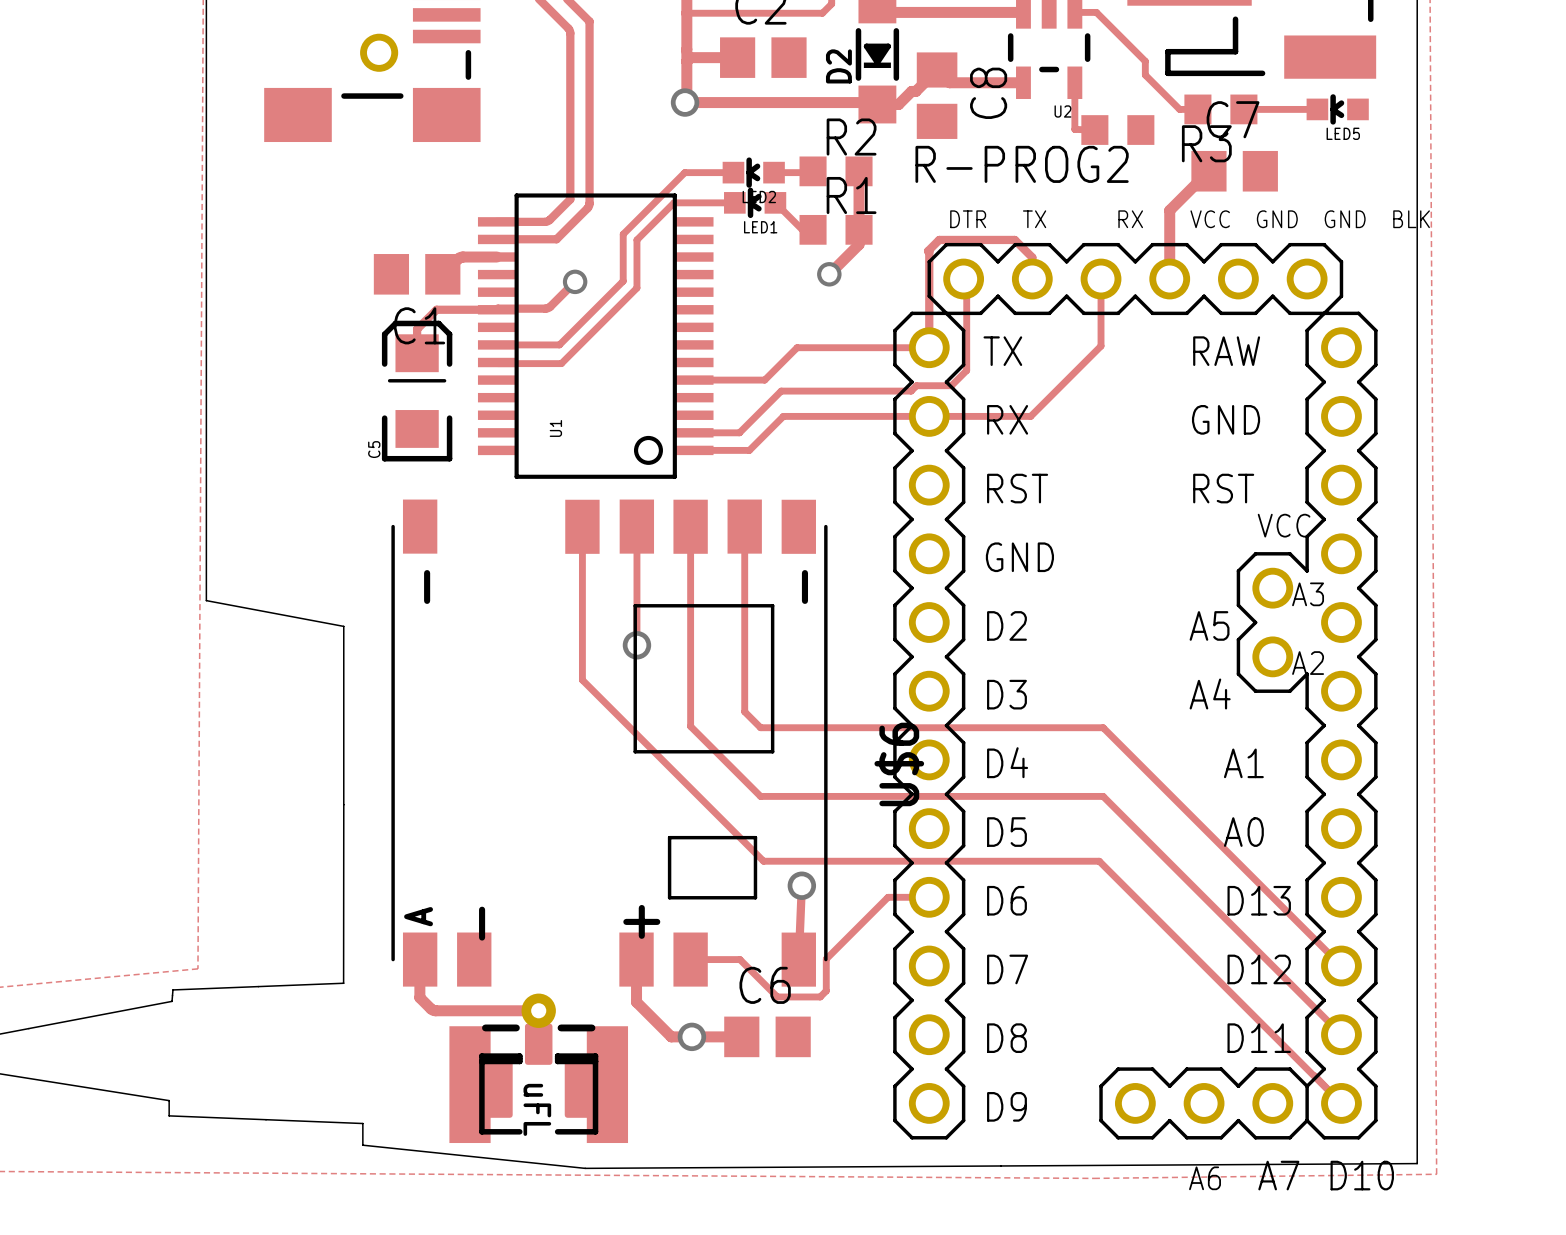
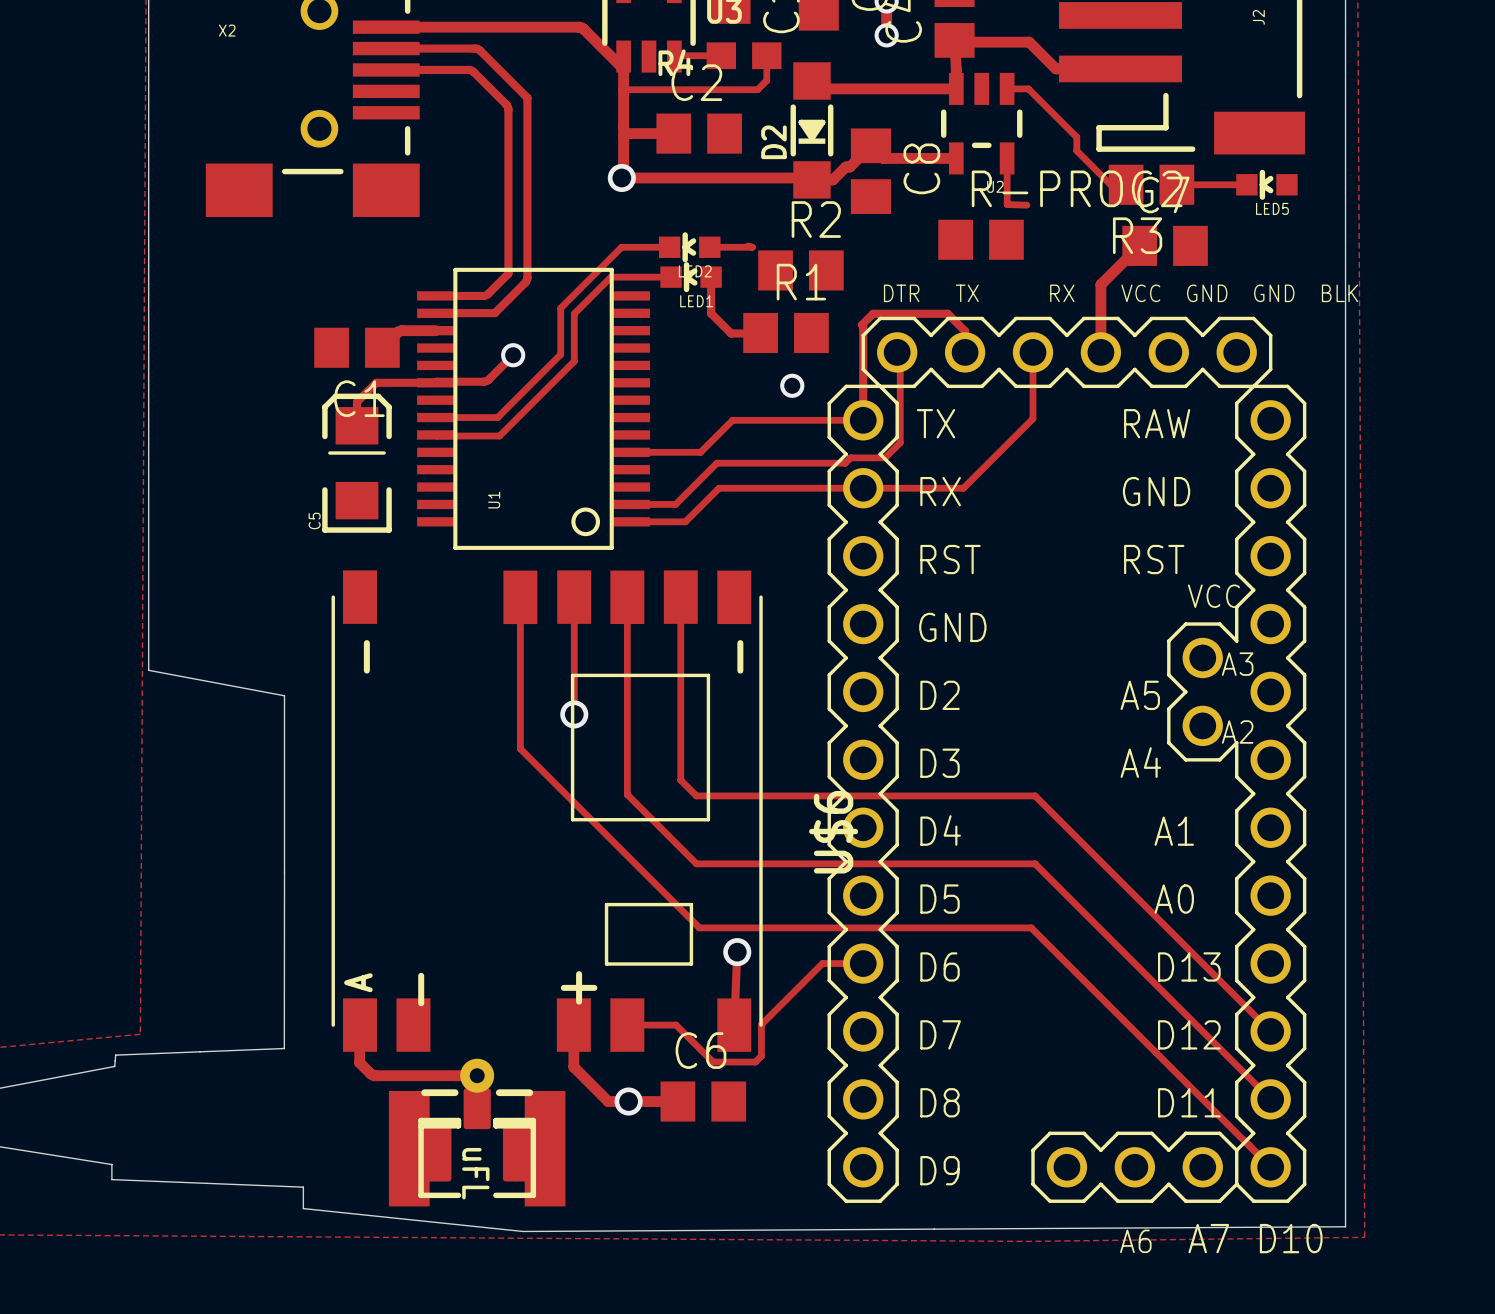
R3 footprint: [1184, 94, 1258, 125] -> [1108, 164, 1195, 205]
R-PROG2 footprint: [1081, 115, 1155, 145] -> [938, 219, 1024, 260]
R3 name position: R3 (1206, 143) -> R3 (1137, 235)
R2 footprint: [799, 156, 873, 187] -> [758, 250, 844, 291]
R-PROG2 name position: R-PROG2 (1022, 164) -> R-PROG2 (1077, 188)
track: (859, 171) (859, 244) (829, 274) -> none
track: (775, 202) (802, 229) (813, 229) -> (711, 277) (711, 313) (731, 333) (760, 333)
R1 footprint: [799, 214, 873, 245] -> [743, 312, 829, 354]
via position: (829, 274) -> (792, 385)

